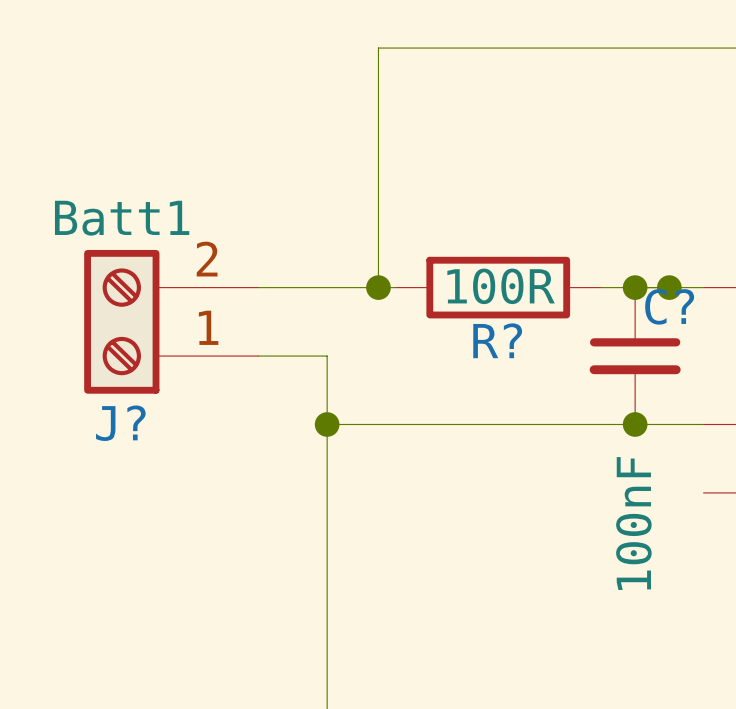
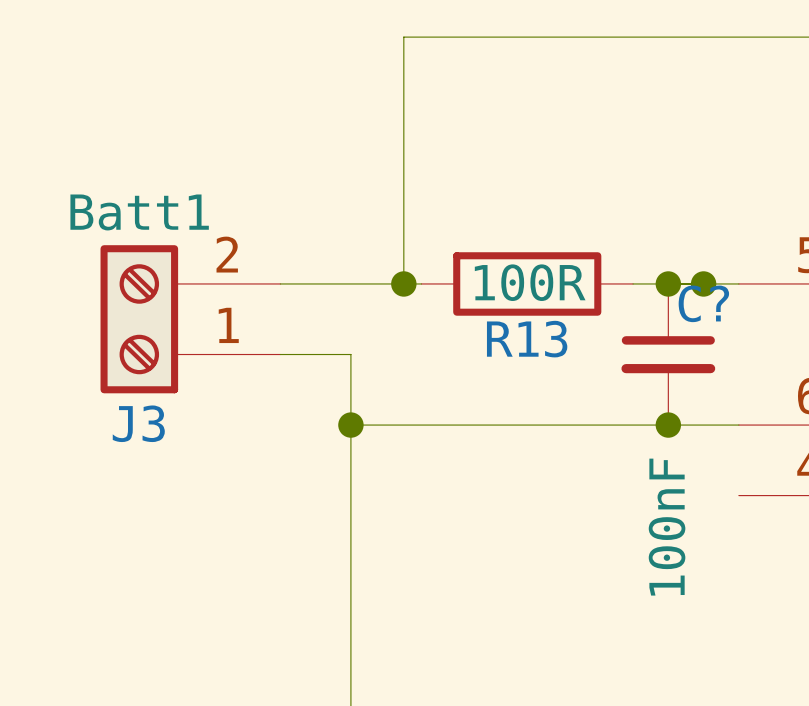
R? name: R? (497, 340) -> R13 (527, 339)
J? name: J? (120, 423) -> J3 (138, 423)

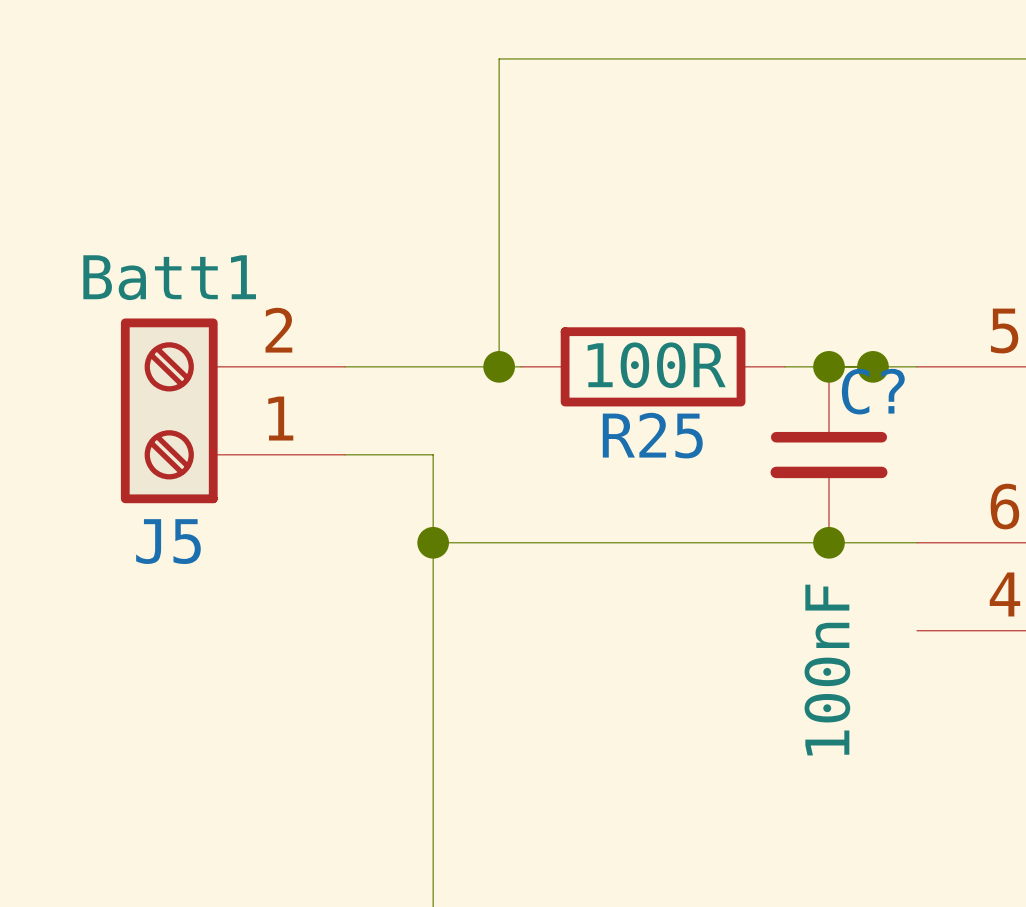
R13 name: R13 (527, 339) -> R25 (652, 435)
J3 name: J3 (138, 423) -> J5 (168, 541)

